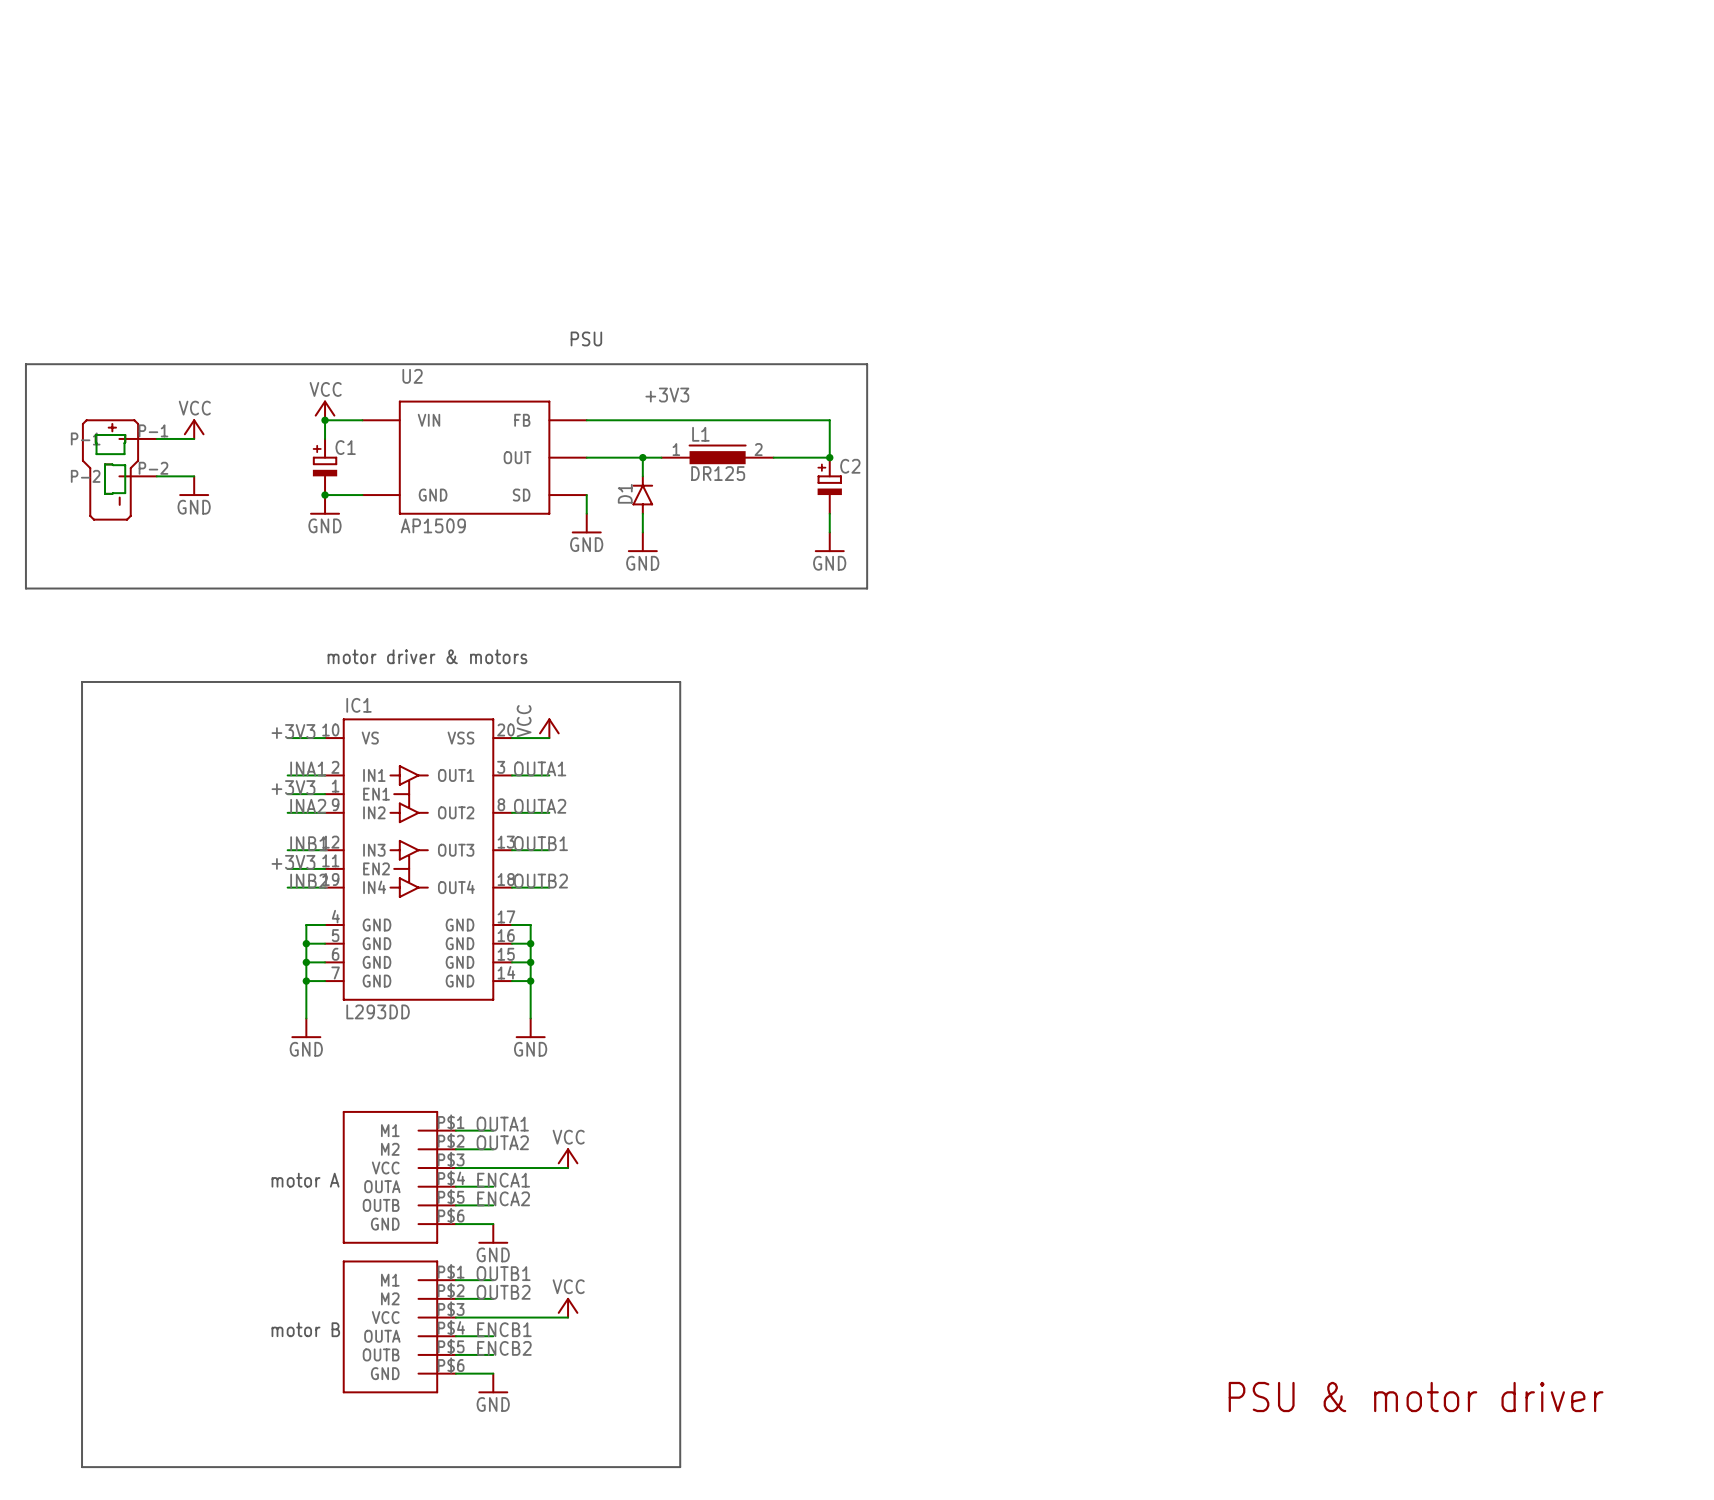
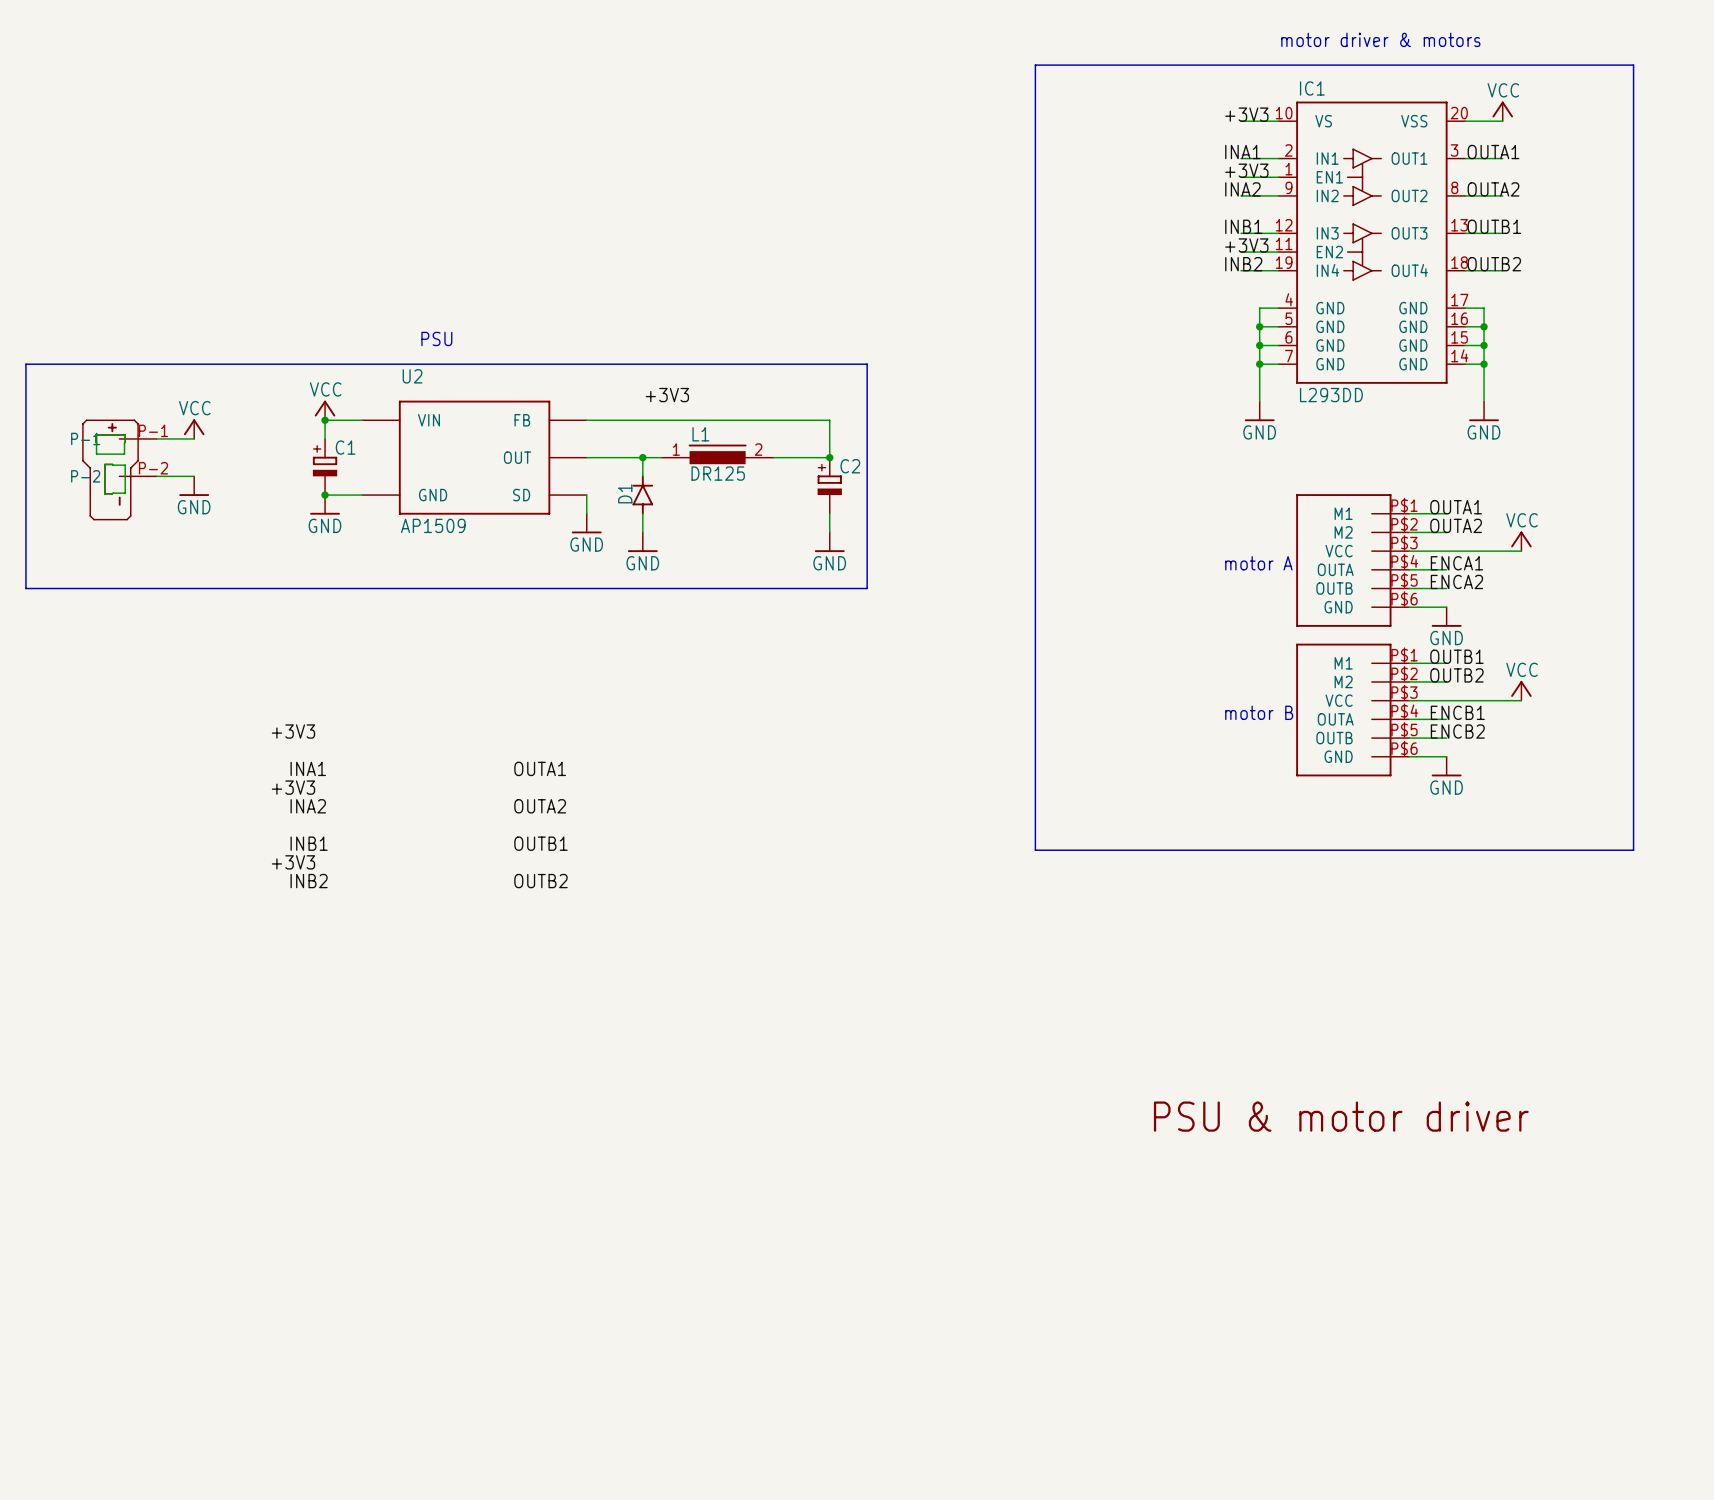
text: none -> motor driver & motors (1380, 39)
line: none -> (1035, 65) (1633, 65) (1633, 850) (1035, 850) (1035, 65)
power symbol: none -> VCC (1502, 111)
label: none -> +3V3 (1246, 114)
wire: none -> (1241, 121) (1278, 121)
wire: none -> (1465, 121) (1502, 121)
label: none -> INA1 (1242, 152)
label: none -> OUTA1 (1493, 152)
wire: none -> (1241, 158) (1278, 158)
wire: none -> (1465, 158) (1502, 158)
label: none -> +3V3 (1246, 170)
wire: none -> (1241, 177) (1278, 177)
label: none -> INA2 (1242, 189)
label: none -> OUTA2 (1493, 189)
wire: none -> (1241, 195) (1278, 195)
wire: none -> (1465, 195) (1502, 195)
label: none -> INB1 (1243, 226)
label: none -> OUTB1 (1494, 226)
wire: none -> (1241, 233) (1278, 233)
wire: none -> (1465, 233) (1502, 233)
label: none -> +3V3 (1246, 245)
wire: none -> (1241, 252) (1278, 252)
label: none -> INB2 (1243, 264)
label: none -> OUTB2 (1494, 264)
wire: none -> (1241, 270) (1278, 270)
wire: none -> (1465, 270) (1502, 270)
wire: none -> (1278, 308) (1259, 308) (1259, 401)
wire: none -> (1465, 308) (1484, 308) (1484, 401)
wire: none -> (1259, 326) (1278, 326)
junction: none -> (1259, 326)
wire: none -> (1465, 326) (1484, 326)
junction: none -> (1484, 326)
text position: PSU (586, 338) -> PSU (436, 338)
wire: none -> (1259, 345) (1278, 345)
junction: none -> (1259, 345)
wire: none -> (1465, 345) (1484, 345)
junction: none -> (1484, 345)
wire: none -> (1259, 364) (1278, 364)
junction: none -> (1259, 364)
wire: none -> (1465, 364) (1484, 364)
junction: none -> (1484, 364)
power symbol: none -> GND (1259, 411)
power symbol: none -> GND (1484, 411)
label: none -> OUTA1 (1456, 507)
wire: none -> (1409, 513) (1446, 513)
label: none -> OUTA2 (1456, 525)
wire: none -> (1409, 532) (1446, 532)
power symbol: none -> VCC (1521, 541)
wire: none -> (1409, 551) (1521, 551)
part: none -> (1352, 560)
text: none -> motor A (1258, 563)
label: none -> ENCA1 (1456, 563)
wire: none -> (1409, 569) (1446, 569)
label: none -> ENCA2 (1456, 581)
wire: none -> (1409, 588) (1446, 588)
wire: none -> (1409, 607) (1446, 607)
power symbol: none -> GND (1446, 617)
text: motor driver & motors (427, 656) -> none
label: none -> OUTB1 (1456, 656)
wire: none -> (1409, 663) (1446, 663)
label: none -> OUTB2 (1456, 675)
line: (82, 681) (680, 681) (680, 1467) (82, 1467) (82, 681) -> none
wire: none -> (1409, 681) (1446, 681)
power symbol: none -> VCC (1521, 690)
wire: none -> (1409, 700) (1521, 700)
part: none -> (1352, 710)
text: none -> motor B (1259, 712)
label: none -> ENCB1 (1457, 712)
wire: none -> (1409, 719) (1446, 719)
power symbol: VCC (549, 728) -> none
label: none -> ENCB2 (1457, 731)
wire: (287, 738) (325, 738) -> none
wire: (511, 738) (549, 738) -> none
wire: none -> (1409, 738) (1446, 738)
wire: none -> (1409, 756) (1446, 756)
power symbol: none -> GND (1446, 766)
wire: (287, 775) (325, 775) -> none
wire: (511, 775) (549, 775) -> none
wire: (287, 794) (325, 794) -> none
wire: (287, 812) (325, 812) -> none
wire: (511, 812) (549, 812) -> none
wire: (287, 850) (325, 850) -> none
wire: (511, 850) (549, 850) -> none
IC1 position: (418, 859) -> (1371, 242)
wire: (287, 868) (325, 868) -> none
wire: (287, 887) (325, 887) -> none
wire: (511, 887) (549, 887) -> none
wire: (325, 924) (306, 924) (306, 1018) -> none
wire: (511, 924) (530, 924) (530, 1018) -> none
wire: (306, 943) (325, 943) -> none
junction: (306, 943) -> none
wire: (511, 943) (530, 943) -> none
junction: (530, 943) -> none
wire: (306, 962) (325, 962) -> none
junction: (306, 962) -> none
wire: (511, 962) (530, 962) -> none
junction: (530, 962) -> none
wire: (306, 981) (325, 981) -> none
junction: (306, 981) -> none
wire: (511, 981) (530, 981) -> none
junction: (530, 981) -> none
power symbol: GND (306, 1028) -> none
power symbol: GND (530, 1028) -> none
text: none -> PSU & motor driver (1341, 1116)
label: OUTA1 (502, 1124) -> none
wire: (455, 1130) (493, 1130) -> none
label: OUTA2 (502, 1142) -> none
wire: (455, 1149) (493, 1149) -> none
power symbol: VCC (568, 1158) -> none
wire: (455, 1168) (568, 1168) -> none
part: (399, 1177) -> none
text: motor A (305, 1180) -> none
label: ENCA1 (503, 1180) -> none
wire: (455, 1186) (493, 1186) -> none
label: ENCA2 (503, 1198) -> none
wire: (455, 1205) (493, 1205) -> none
wire: (455, 1224) (493, 1224) -> none
power symbol: GND (493, 1233) -> none
label: OUTB1 (503, 1273) -> none
wire: (455, 1280) (493, 1280) -> none
label: OUTB2 (503, 1292) -> none
wire: (455, 1298) (493, 1298) -> none
power symbol: VCC (568, 1307) -> none
wire: (455, 1317) (568, 1317) -> none
part: (399, 1326) -> none
text: motor B (305, 1329) -> none
label: ENCB1 (504, 1329) -> none
wire: (455, 1336) (493, 1336) -> none
label: ENCB2 (504, 1348) -> none
wire: (455, 1354) (493, 1354) -> none
wire: (455, 1373) (493, 1373) -> none
power symbol: GND (493, 1383) -> none
text: PSU & motor driver (1416, 1397) -> none

